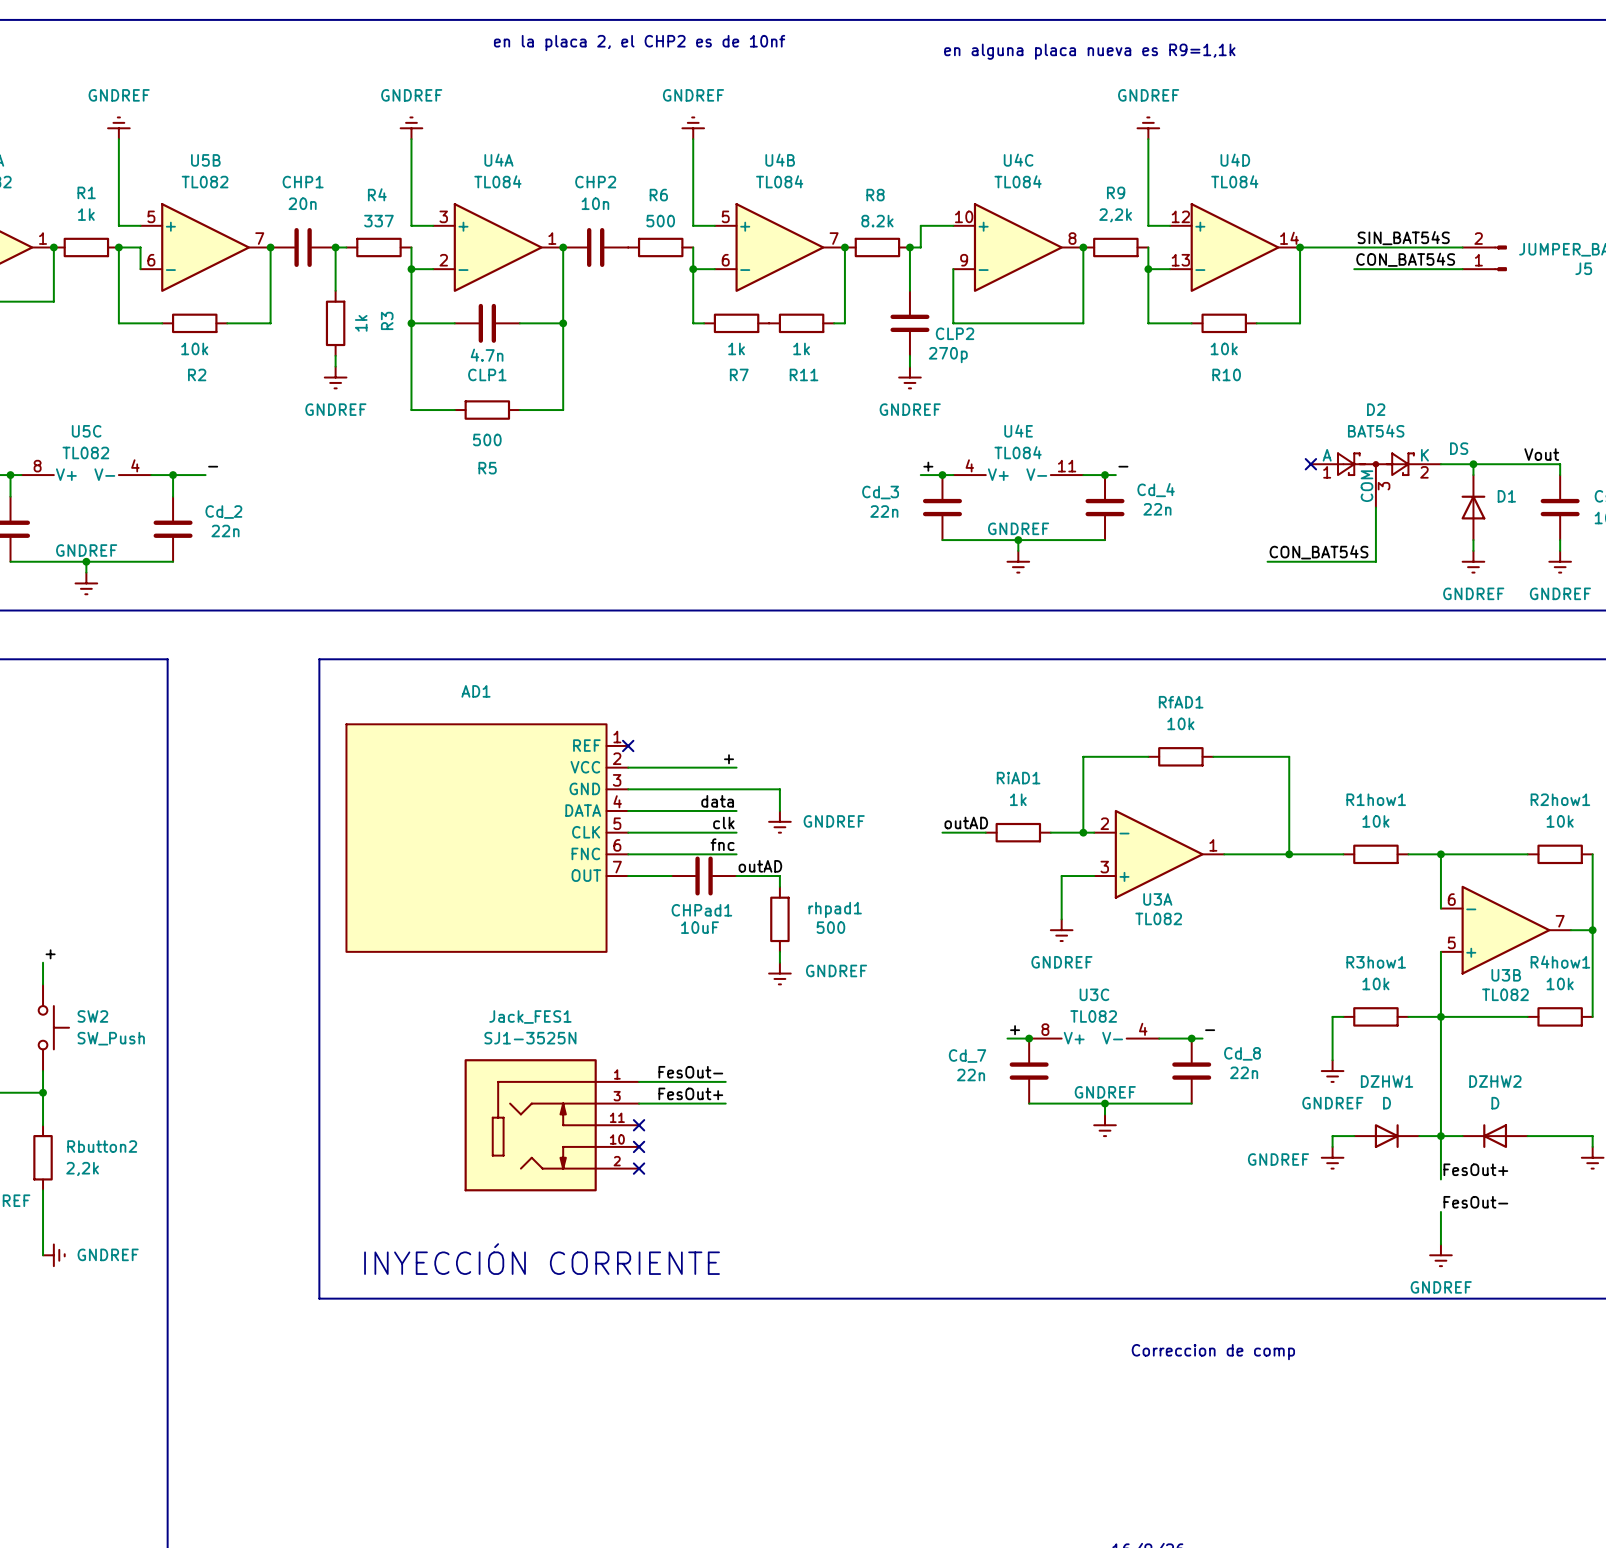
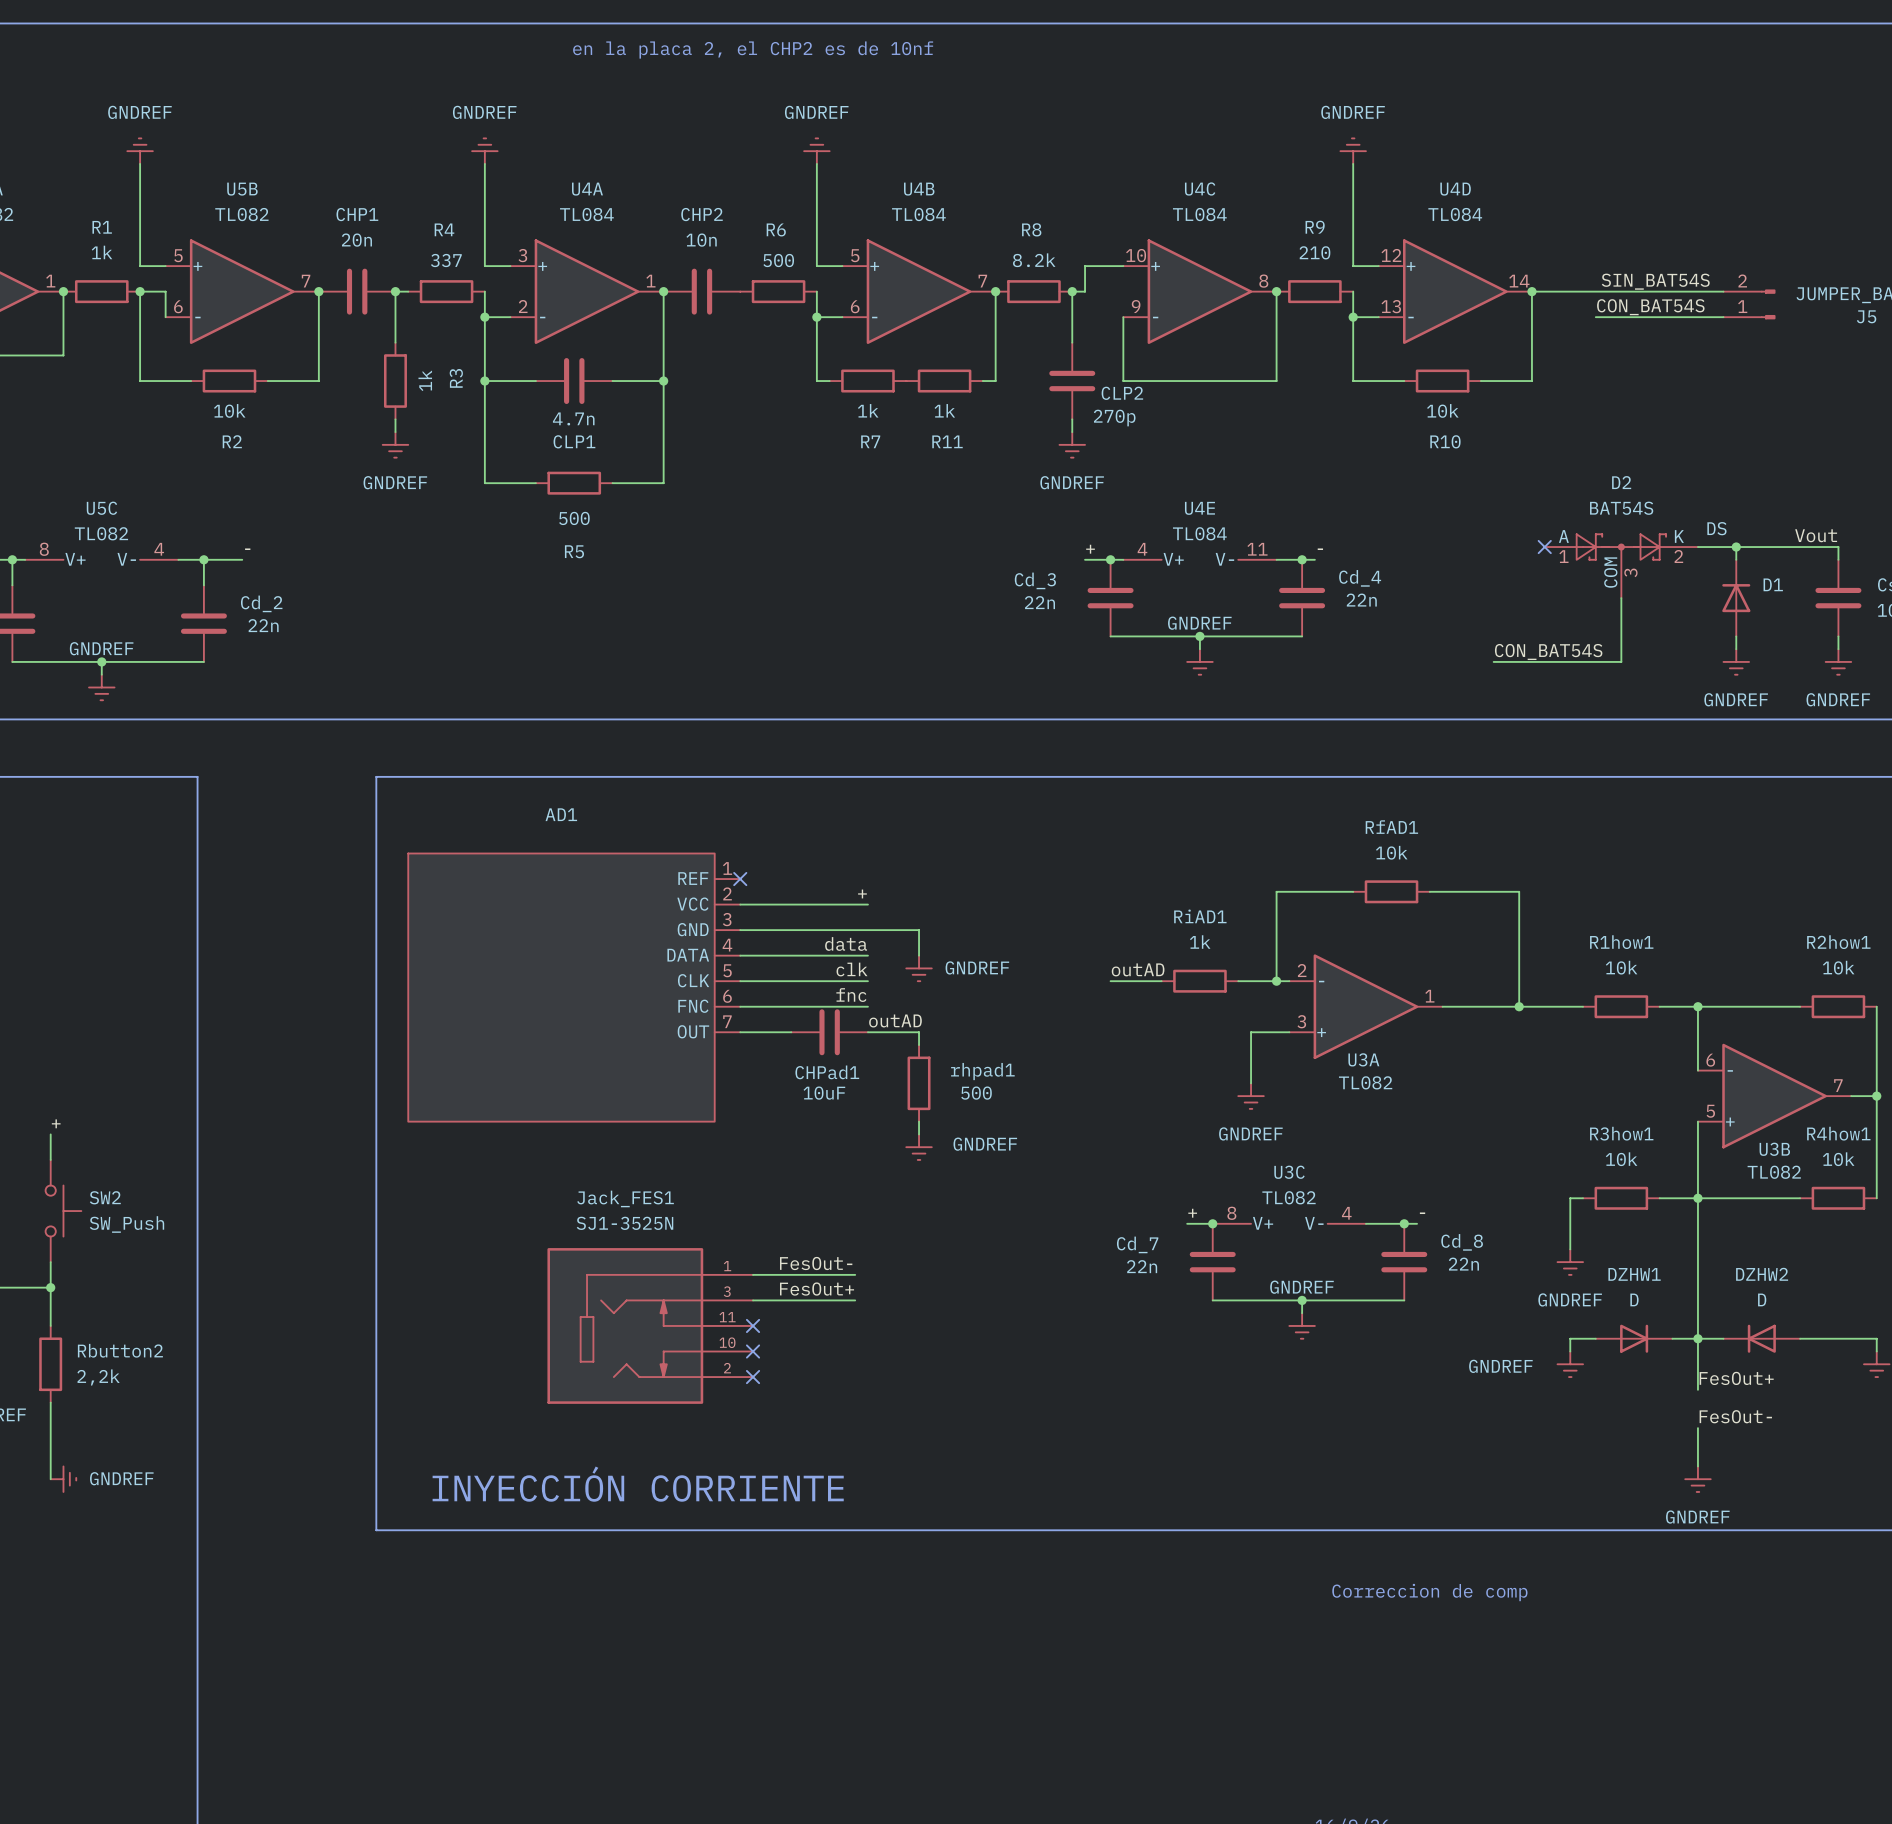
text: en alguna placa nueva es R9=1,1k (1089, 51) -> none
R9 value: 2,2k (1115, 215) -> 210 (1314, 252)

